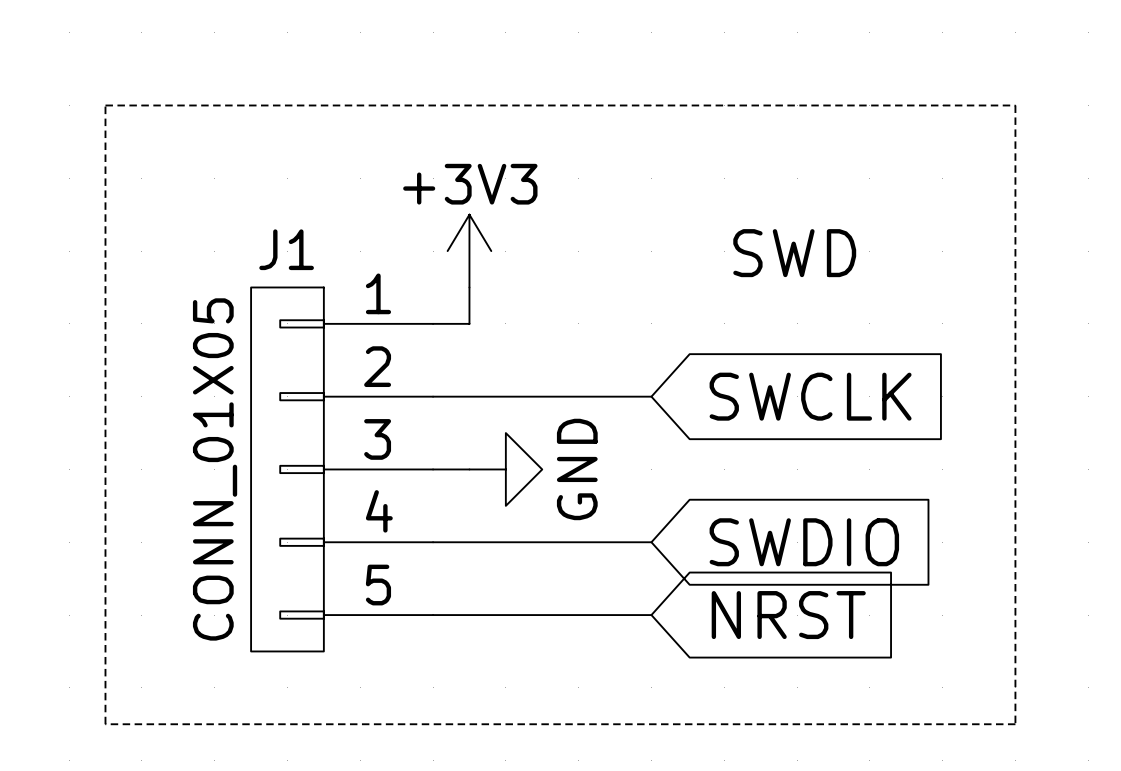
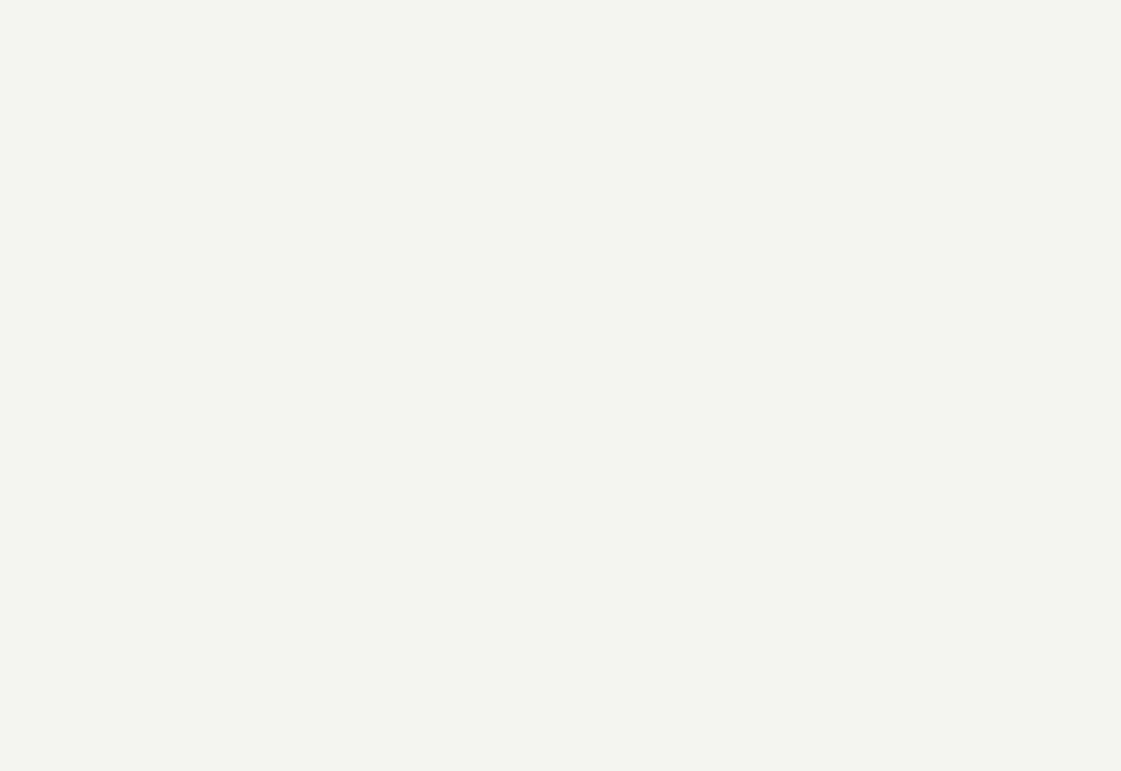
line: (105, 105) (1015, 105) (1015, 724) (105, 724) (105, 105) -> none
power symbol: +3V3 (469, 251) -> none
text: SWD (794, 253) -> none
wire: (469, 287) (469, 323) (433, 323) -> none
wire: (433, 396) (651, 396) -> none
global label: SWCLK (810, 396) -> none
J1: CONN_01X05 (342, 469) -> none
wire: (433, 469) (469, 469) -> none
power symbol: GND (505, 469) -> none
wire: (433, 542) (651, 542) -> none
global label: SWDIO (804, 542) -> none
wire: (433, 615) (651, 615) -> none
global label: NRST (788, 615) -> none

